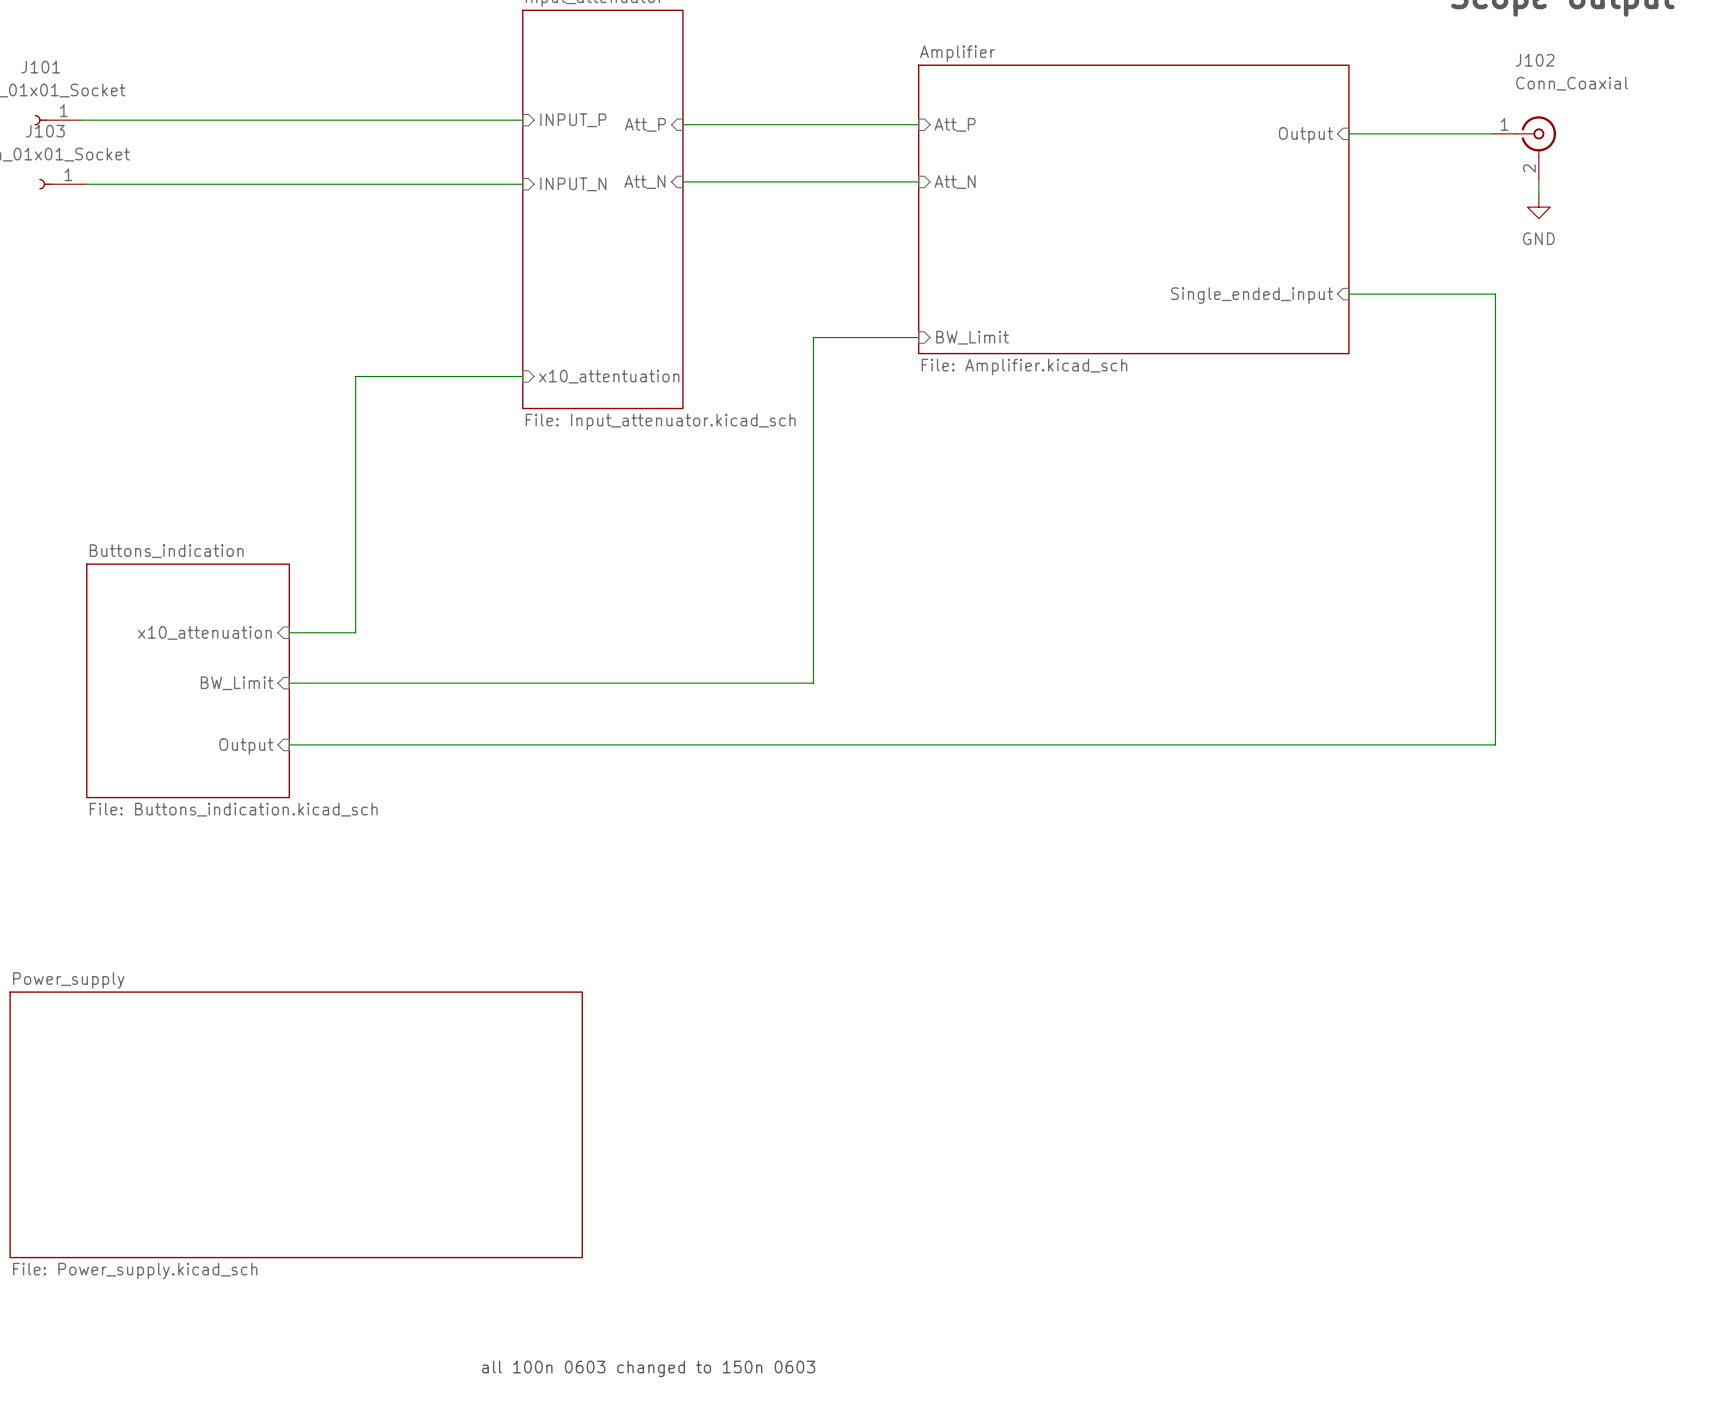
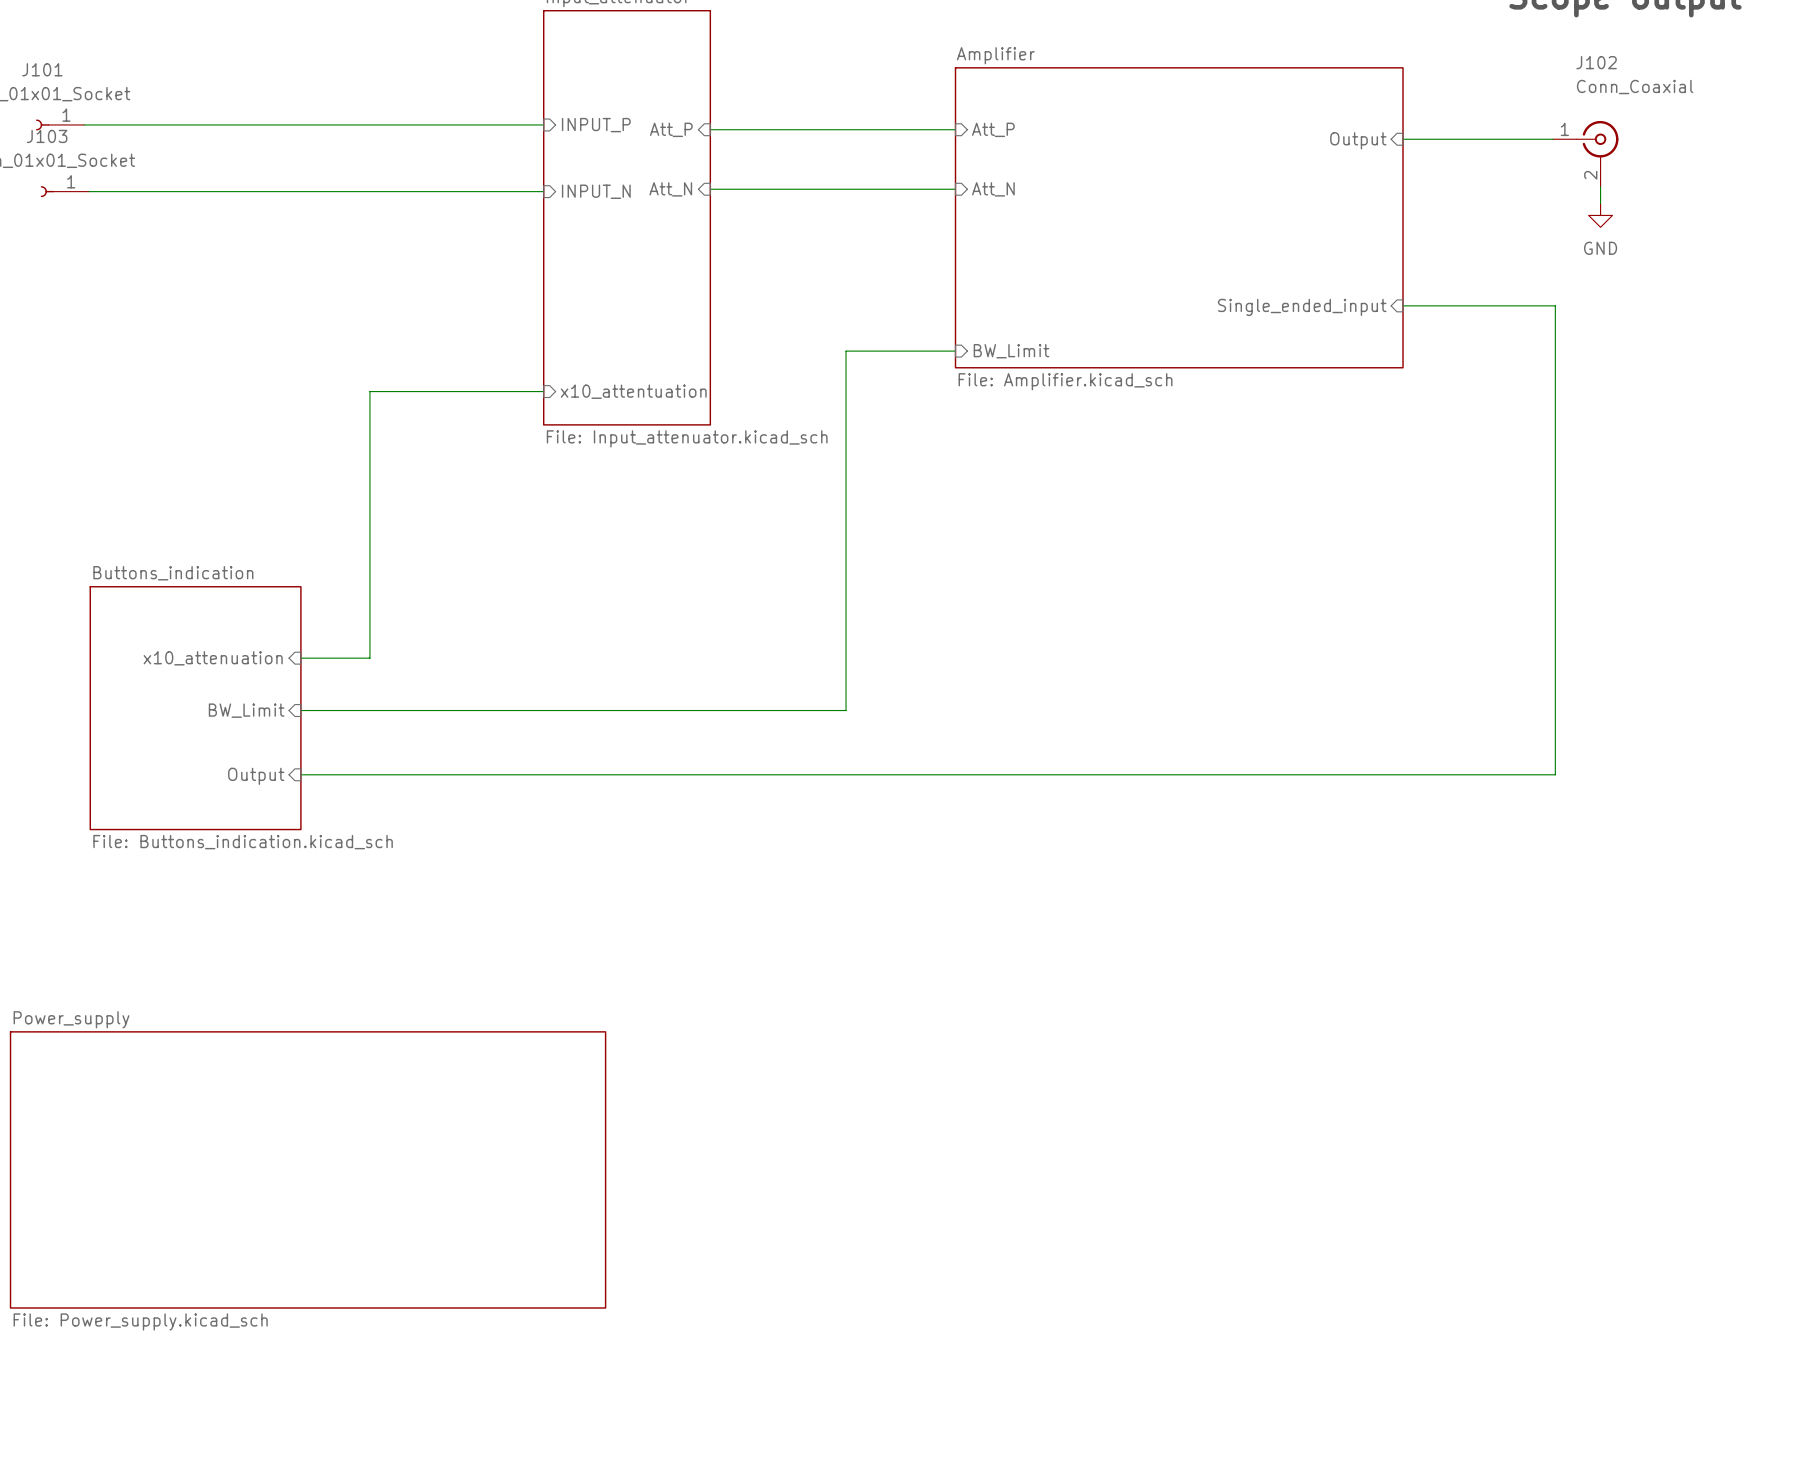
text: all 100n 0603 changed to 150n 0603 (648, 1368) -> none

